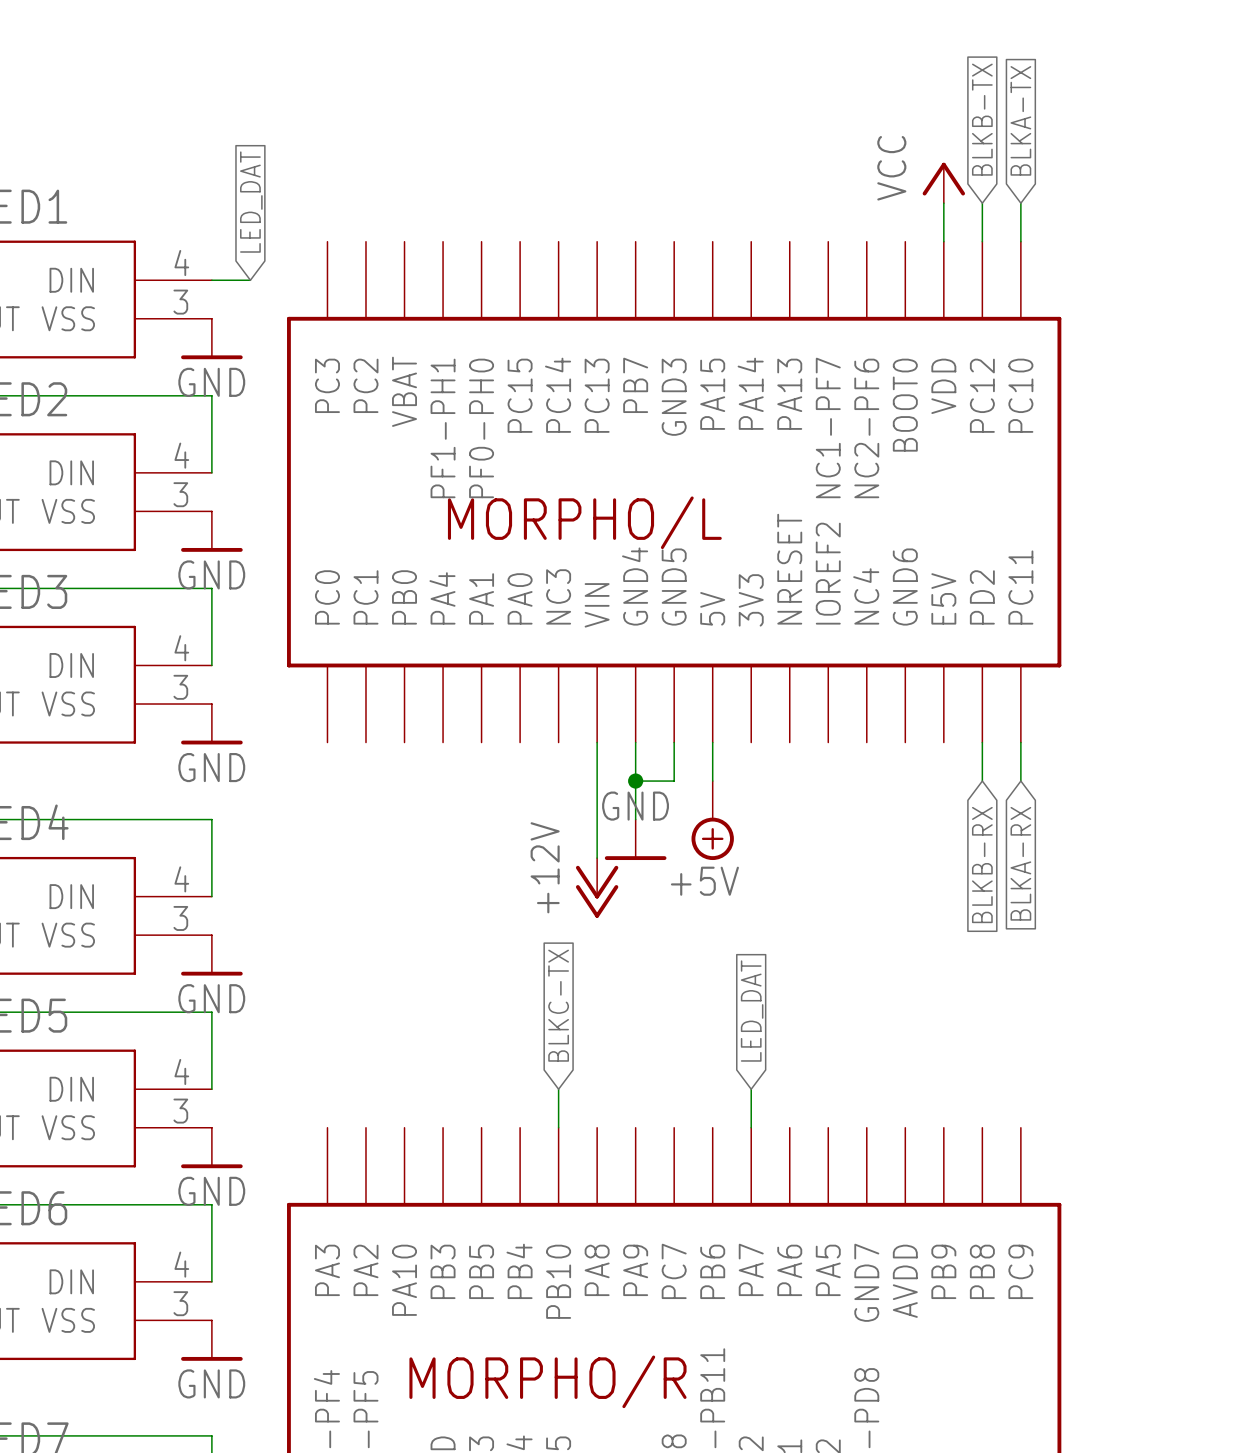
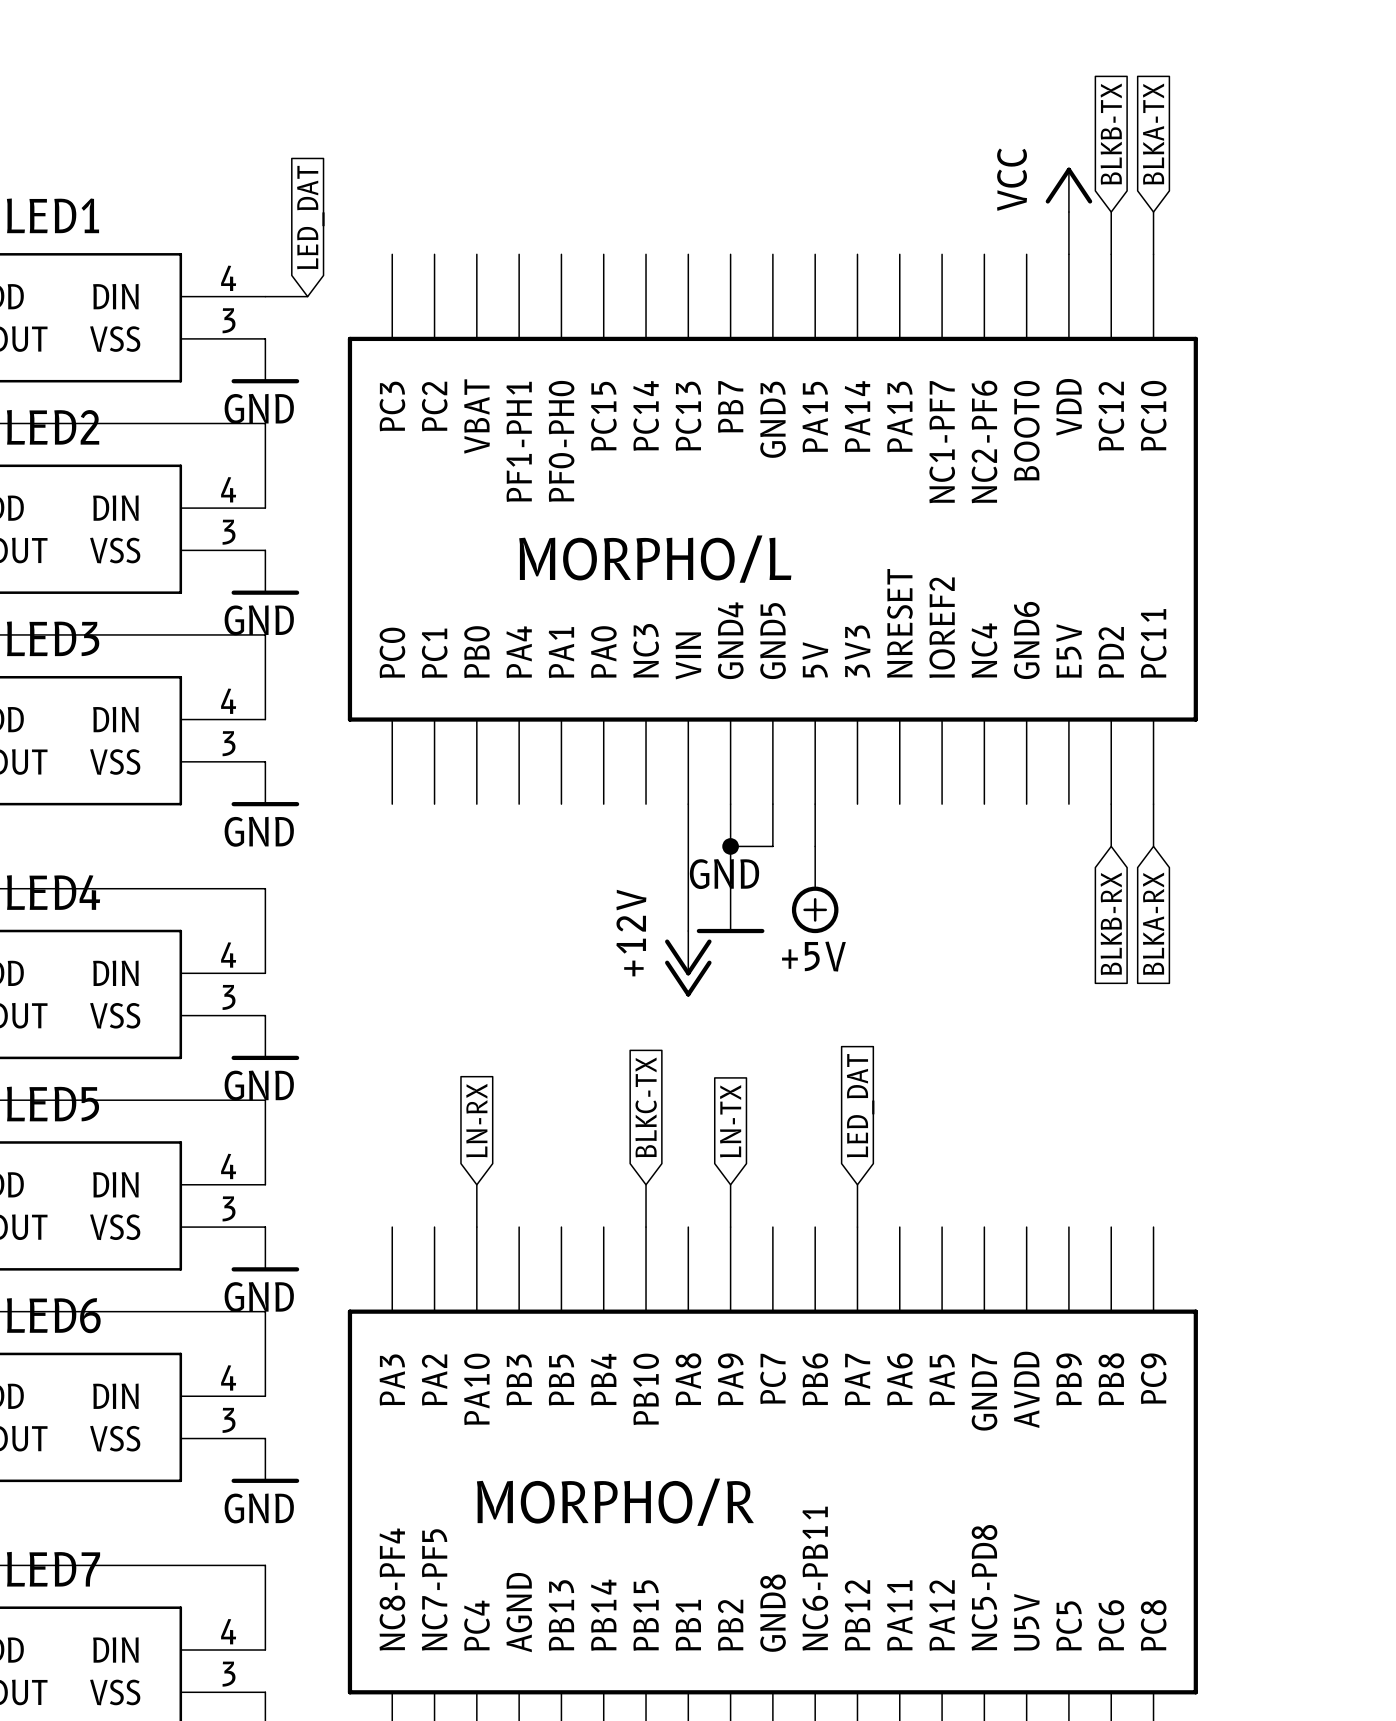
global label: none -> LN-RX (476, 1120)
global label: none -> LN-TX (730, 1121)
wire: none -> (476, 1184) (476, 1227)
wire: none -> (730, 1184) (730, 1227)

